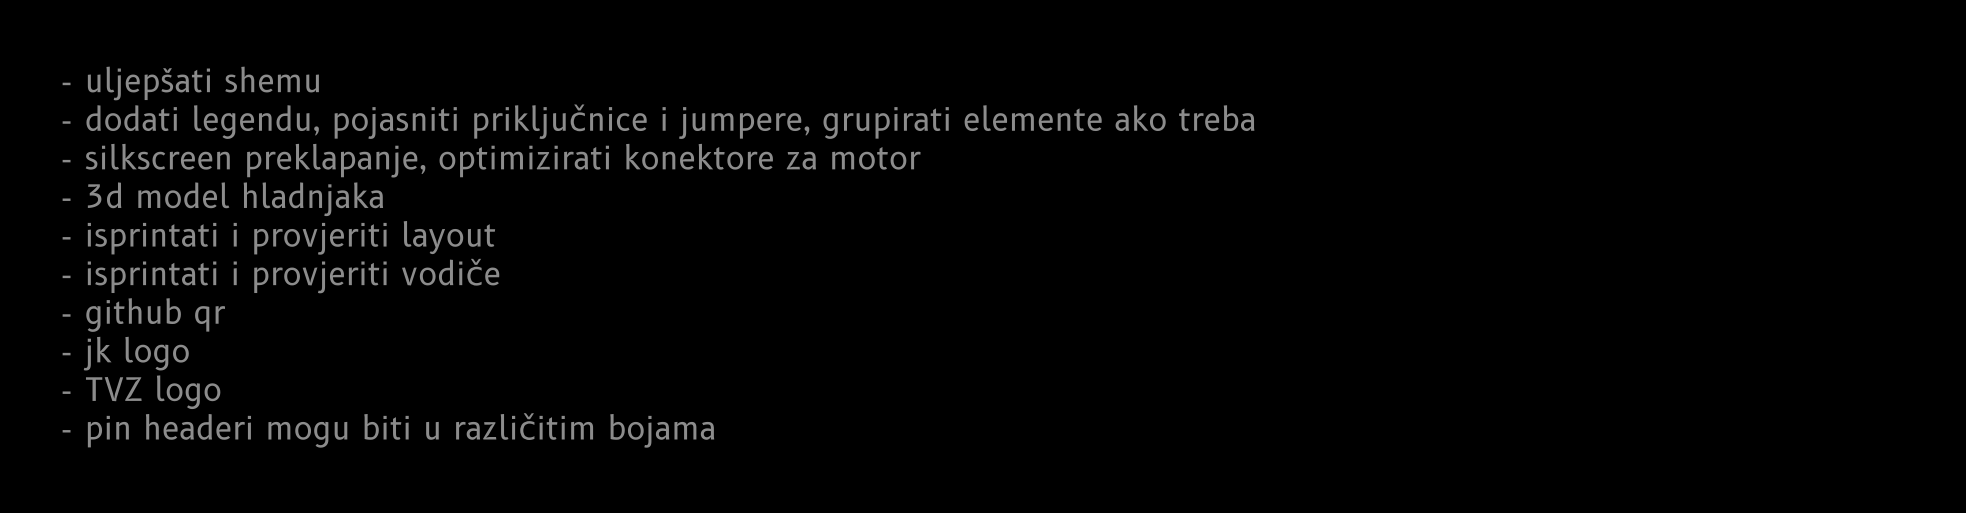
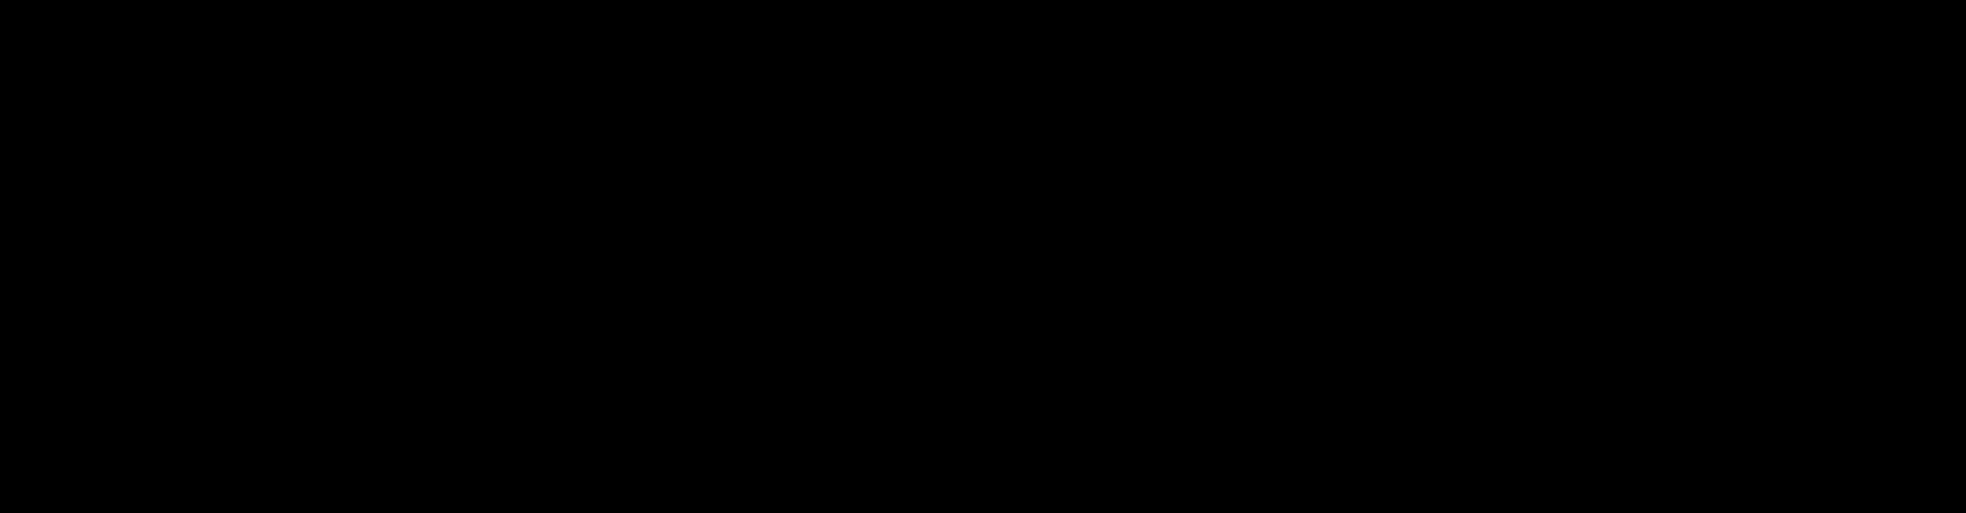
text: - uljepšati shemu (190, 83) -> none
text: - dodati legendu, pojasniti priključnice i jumpere, grupirati elemente ako treba (658, 121) -> none
text: - silkscreen preklapanje, optimizirati konektore za motor (491, 160) -> none
text: - 3d model hladnjaka (222, 199) -> none
text: - isprintati i provjeriti layout (278, 237) -> none
text: - isprintati i provjeriti vodiče (280, 276) -> none
text: - github qr (143, 315) -> none
text: - jk logo (125, 353) -> none
text: - TVZ logo (141, 392) -> none
text: - pin headeri mogu biti u različitim bojama (388, 430) -> none

